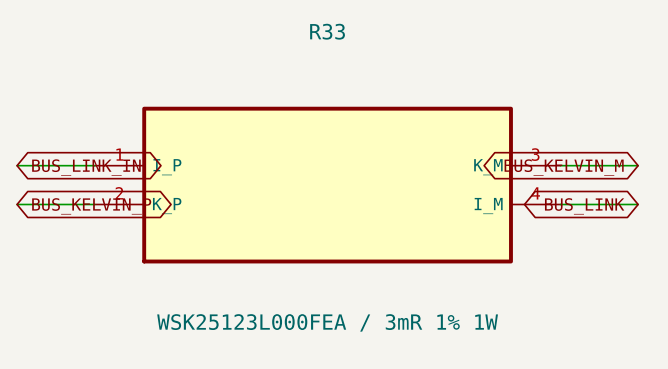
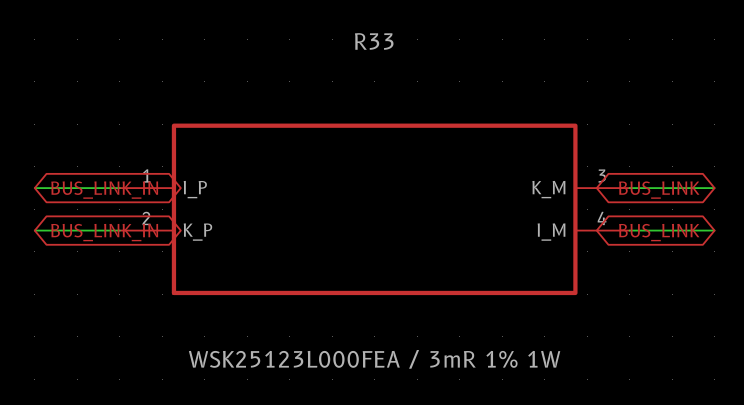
global label: BUS_KELVIN_M (564, 167) -> BUS_LINK (659, 190)
global label: BUS_KELVIN_P (91, 206) -> BUS_LINK_IN (104, 232)

